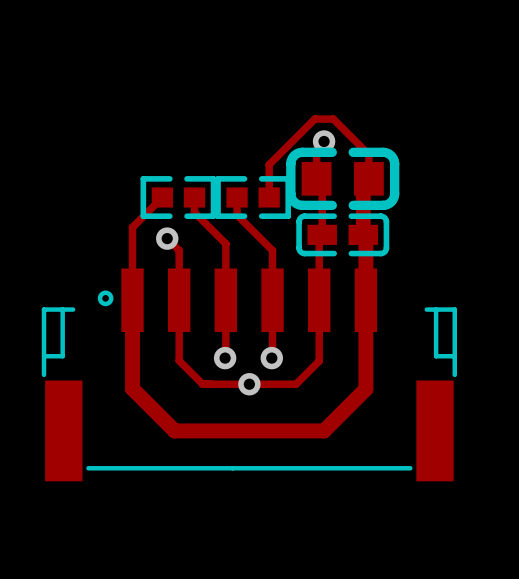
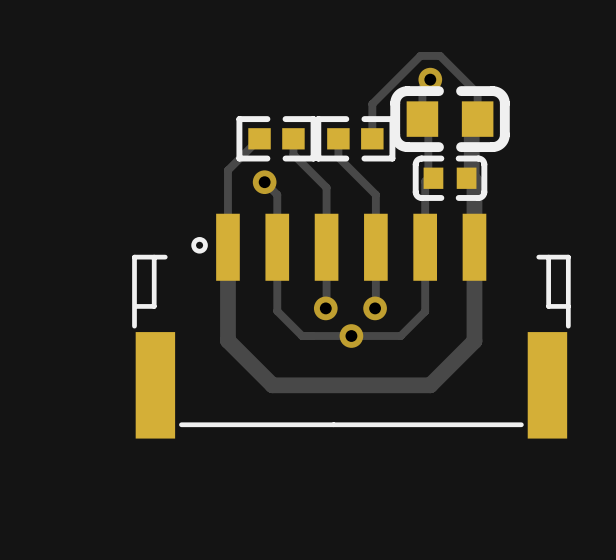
part footprint: [296, 213, 390, 257] -> [412, 155, 488, 201]

